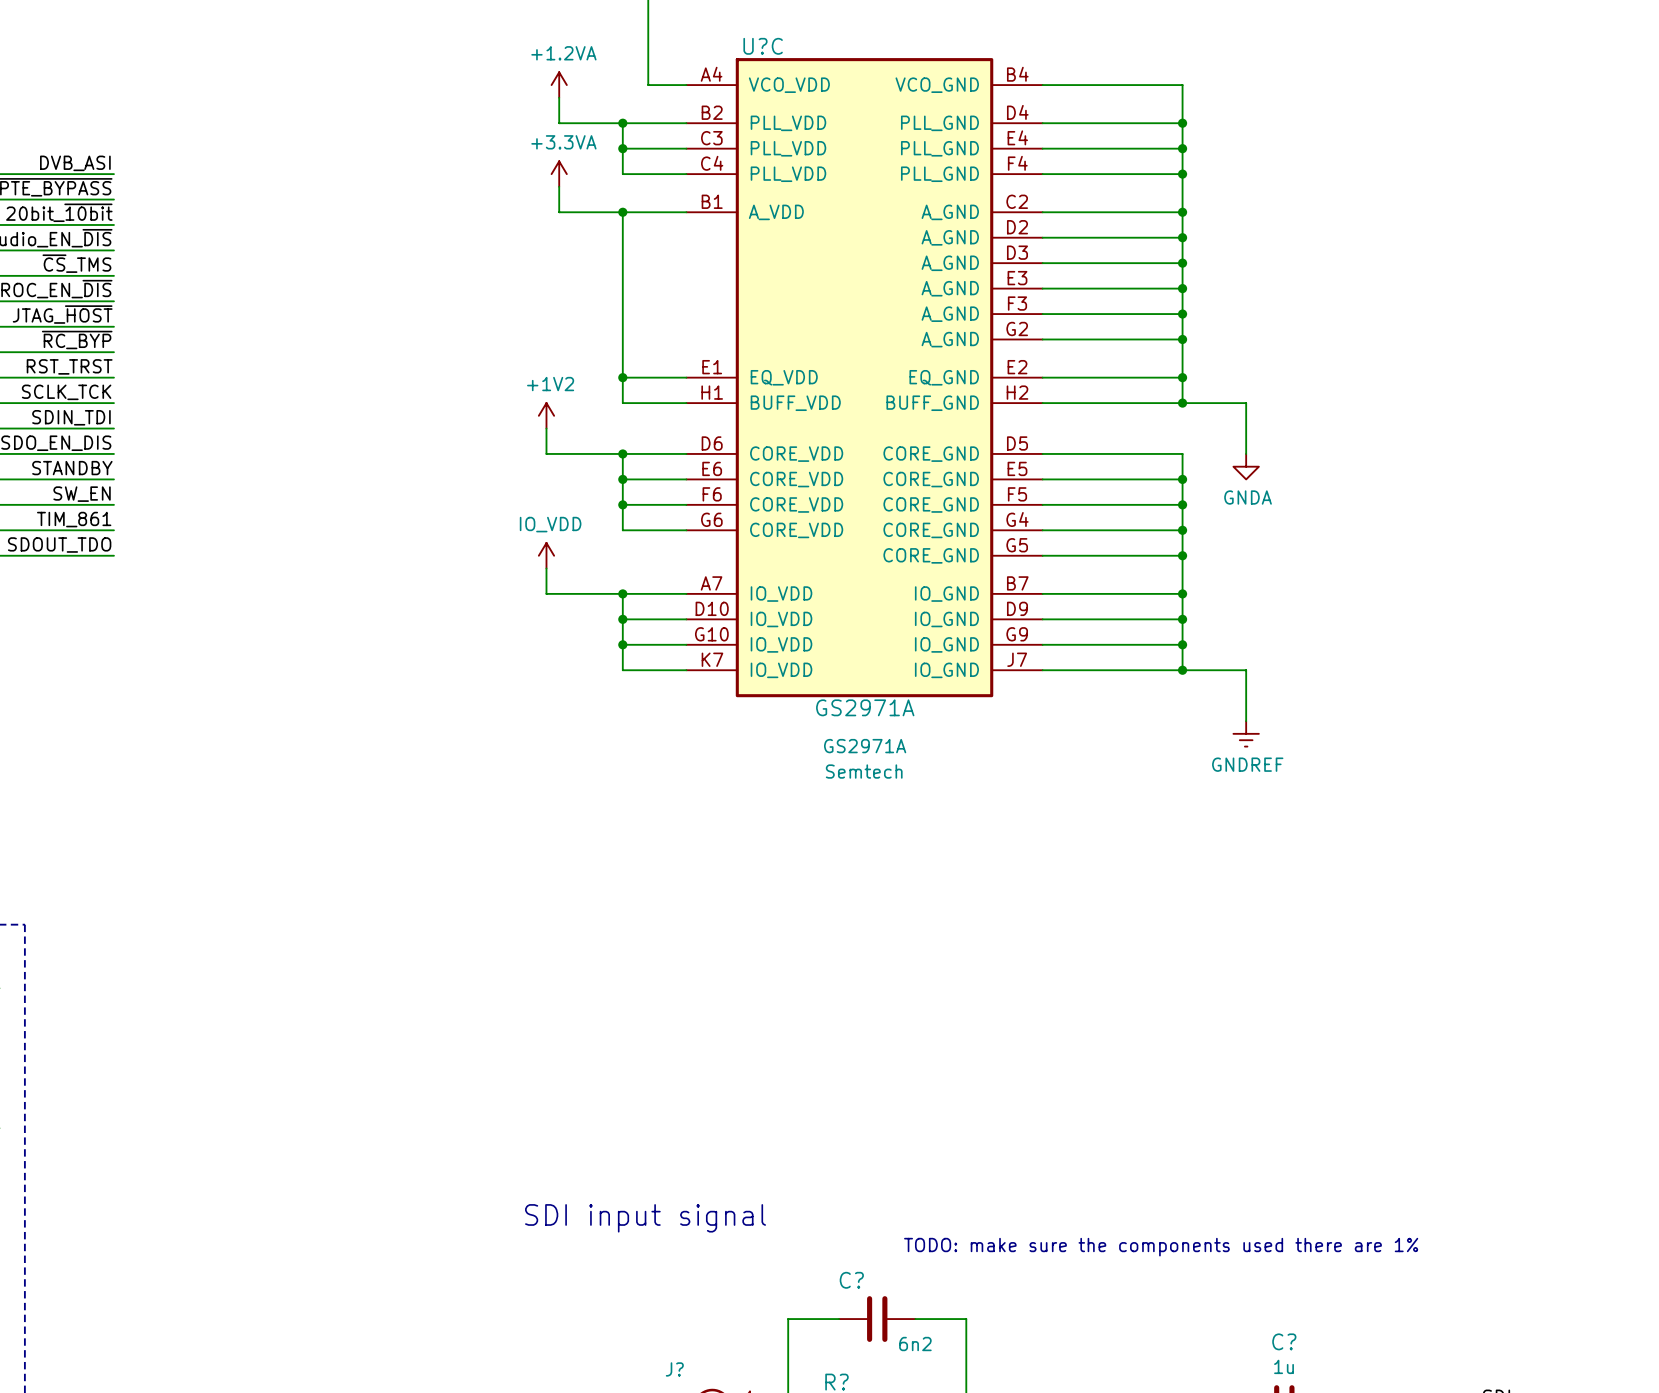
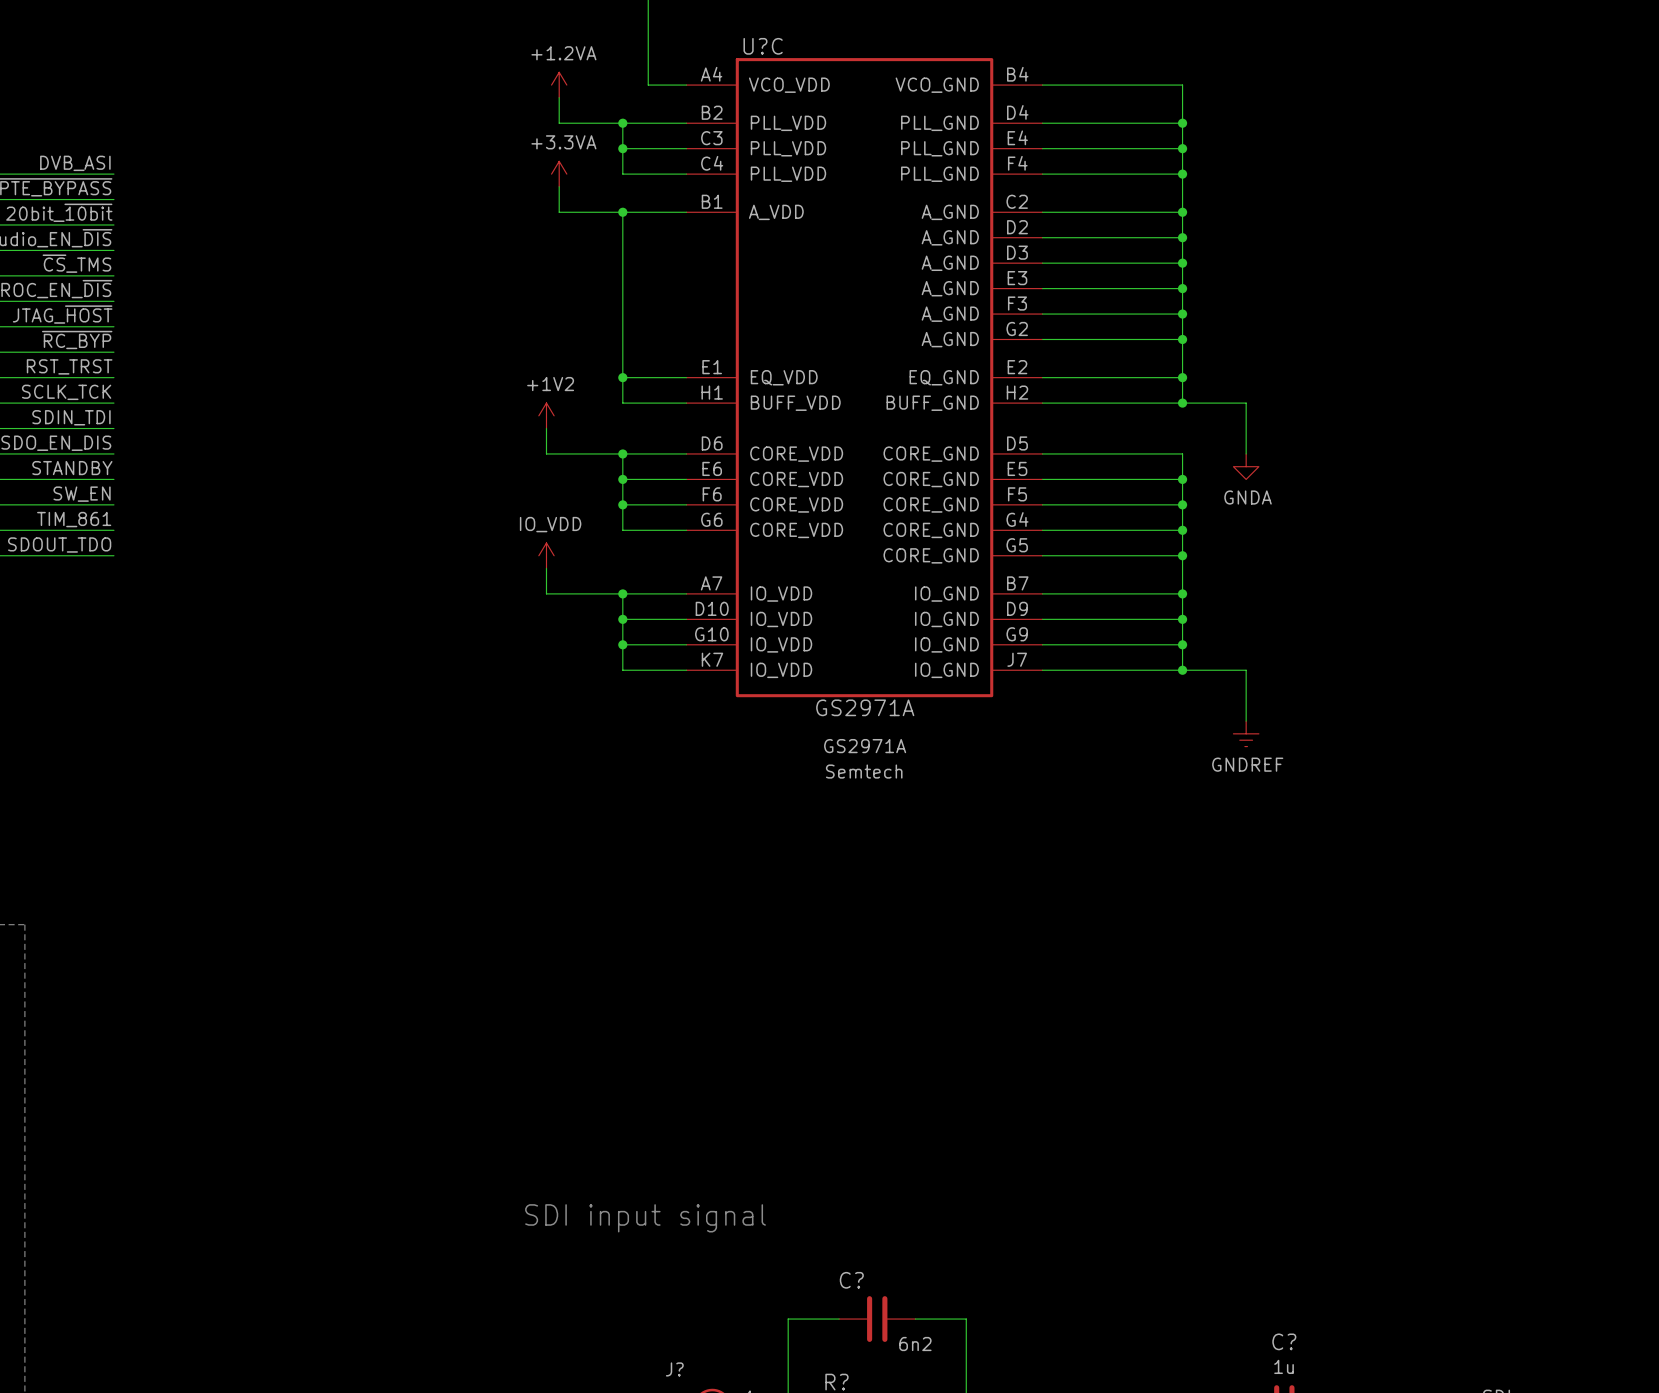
text: TODO: make sure the components used there are 1% (1161, 1247) -> none

